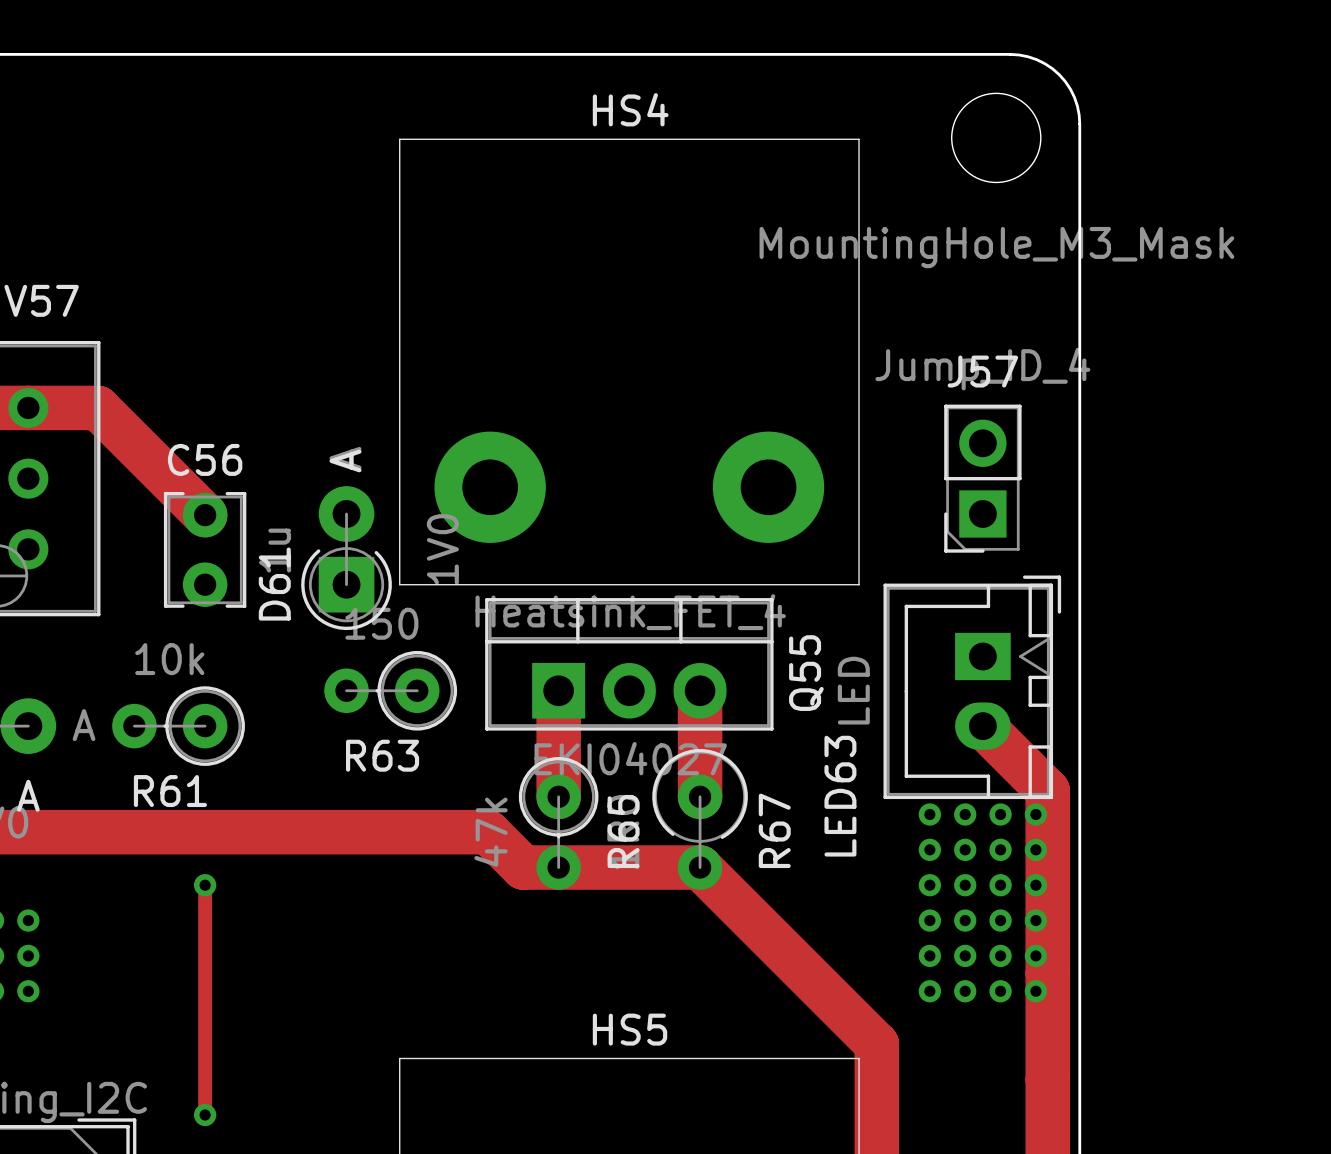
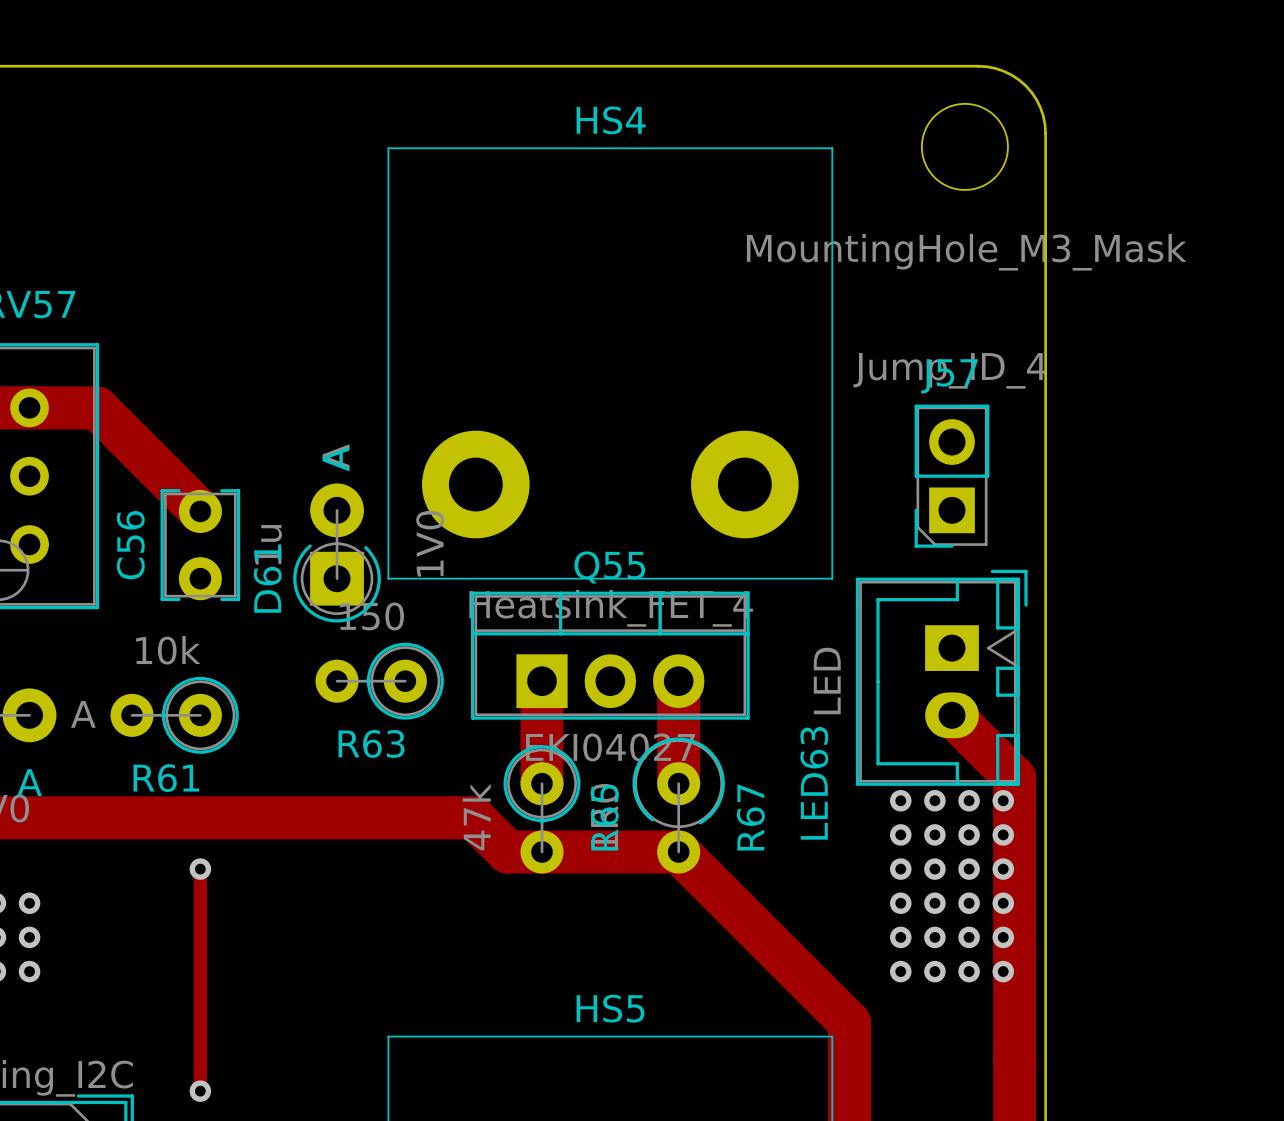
C56 name rotation: 0° (205, 459) -> 90° counterclockwise (130, 545)
C56 name position: C56 (205, 459) -> C56 (130, 545)
Q55 name rotation: 0° (806, 673) -> 90° clockwise (609, 567)
Q55 name position: Q55 (806, 673) -> Q55 (609, 567)

